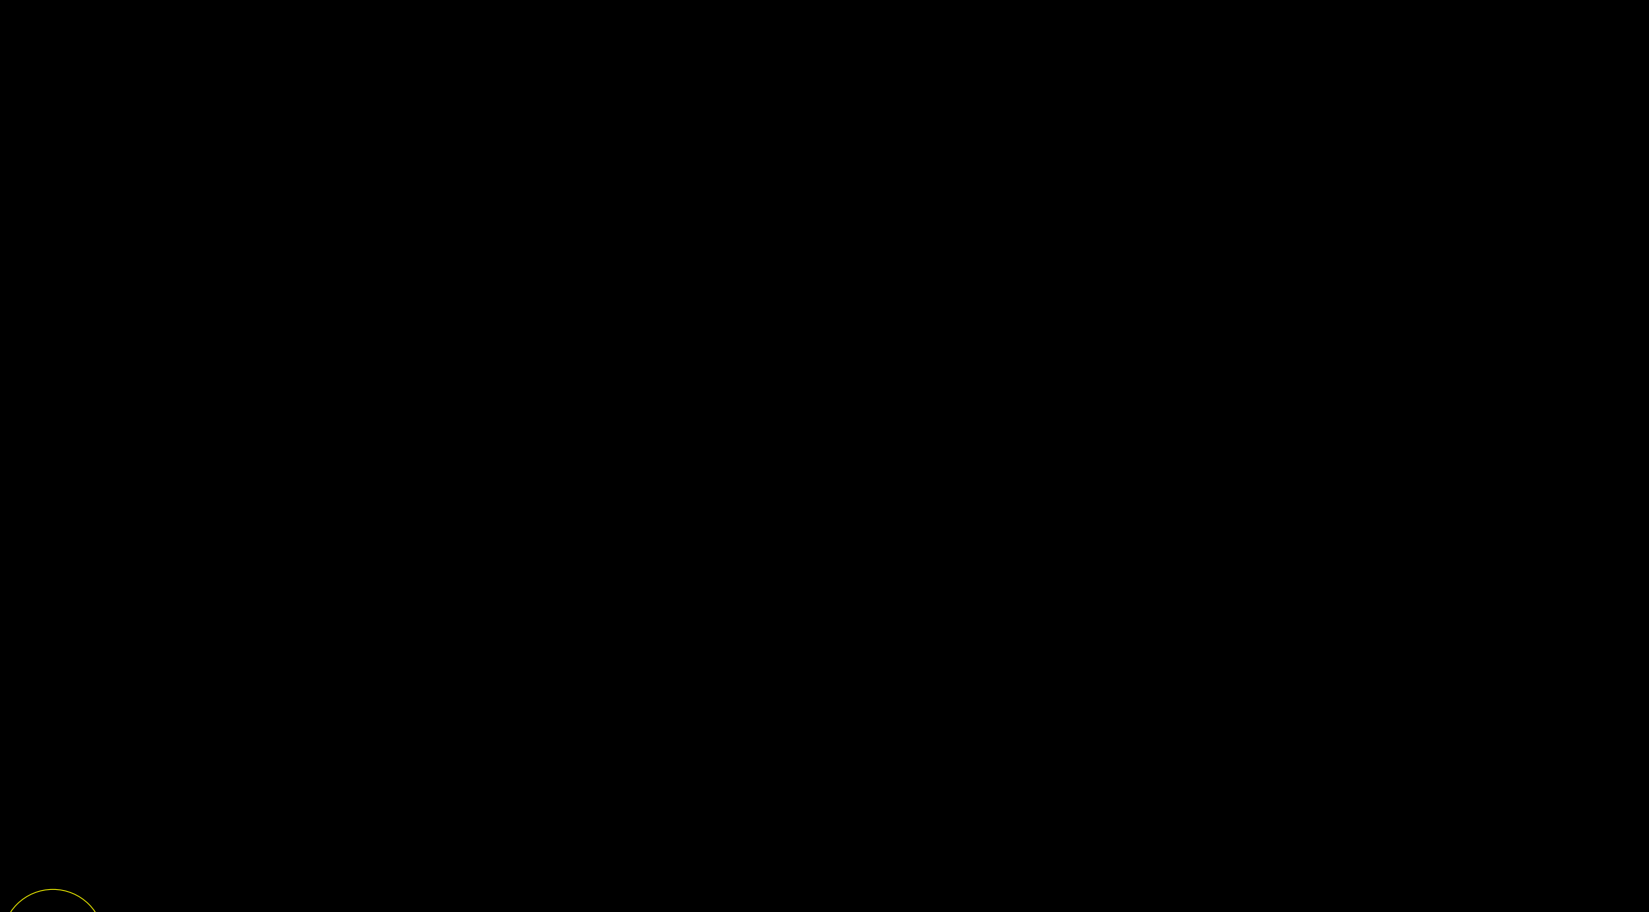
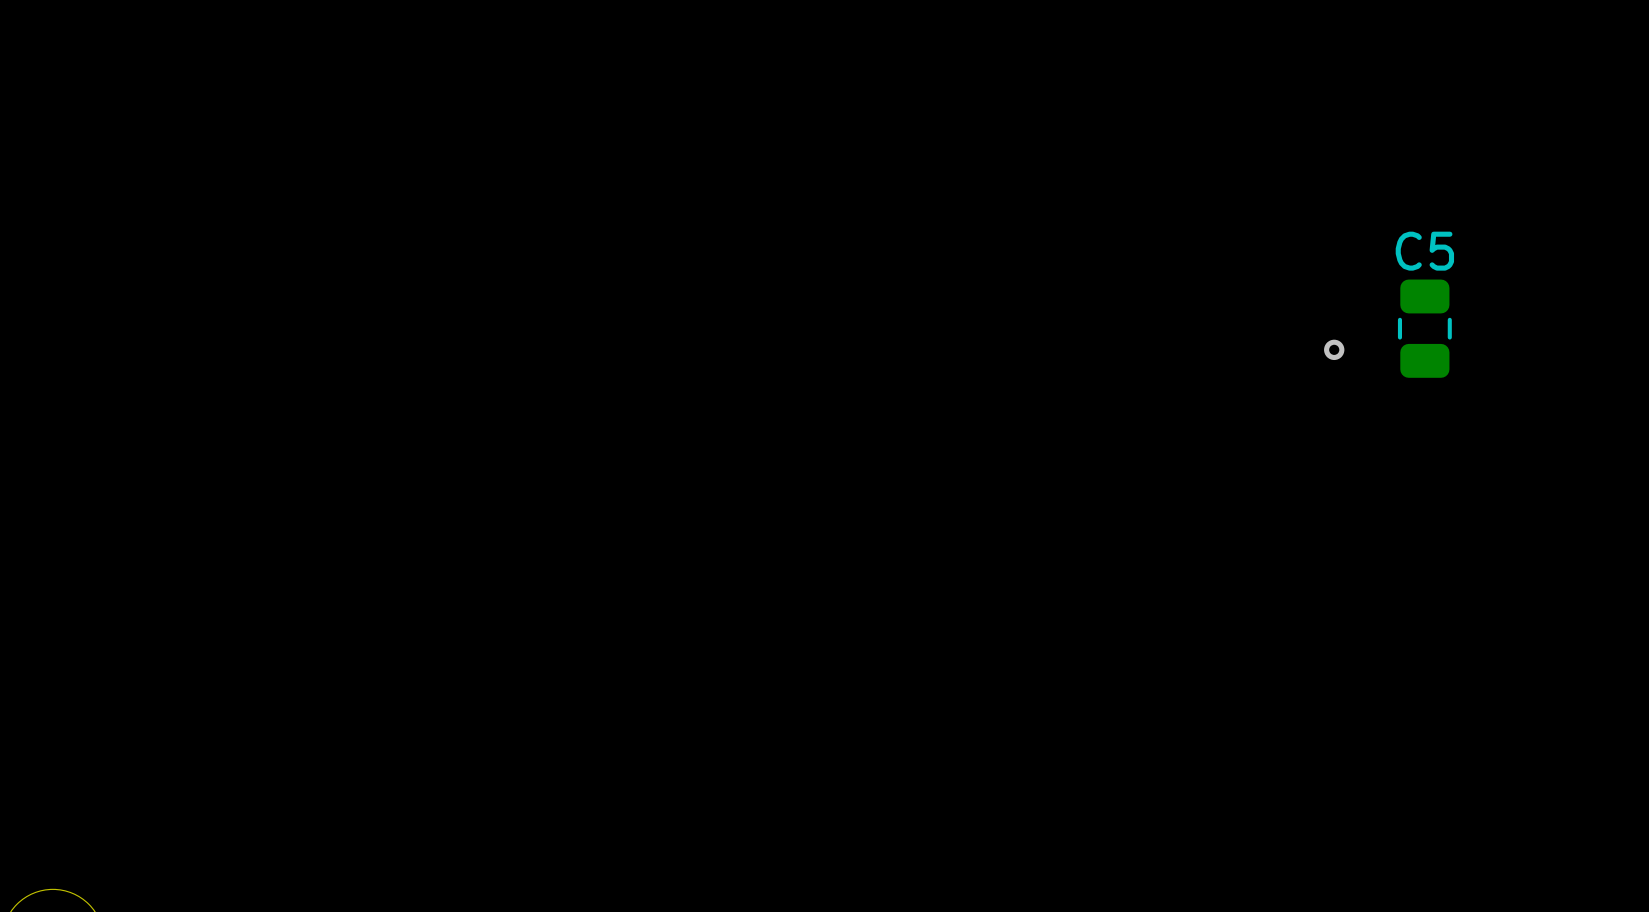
C5: none -> (1424, 328)
via: none -> (1334, 349)

